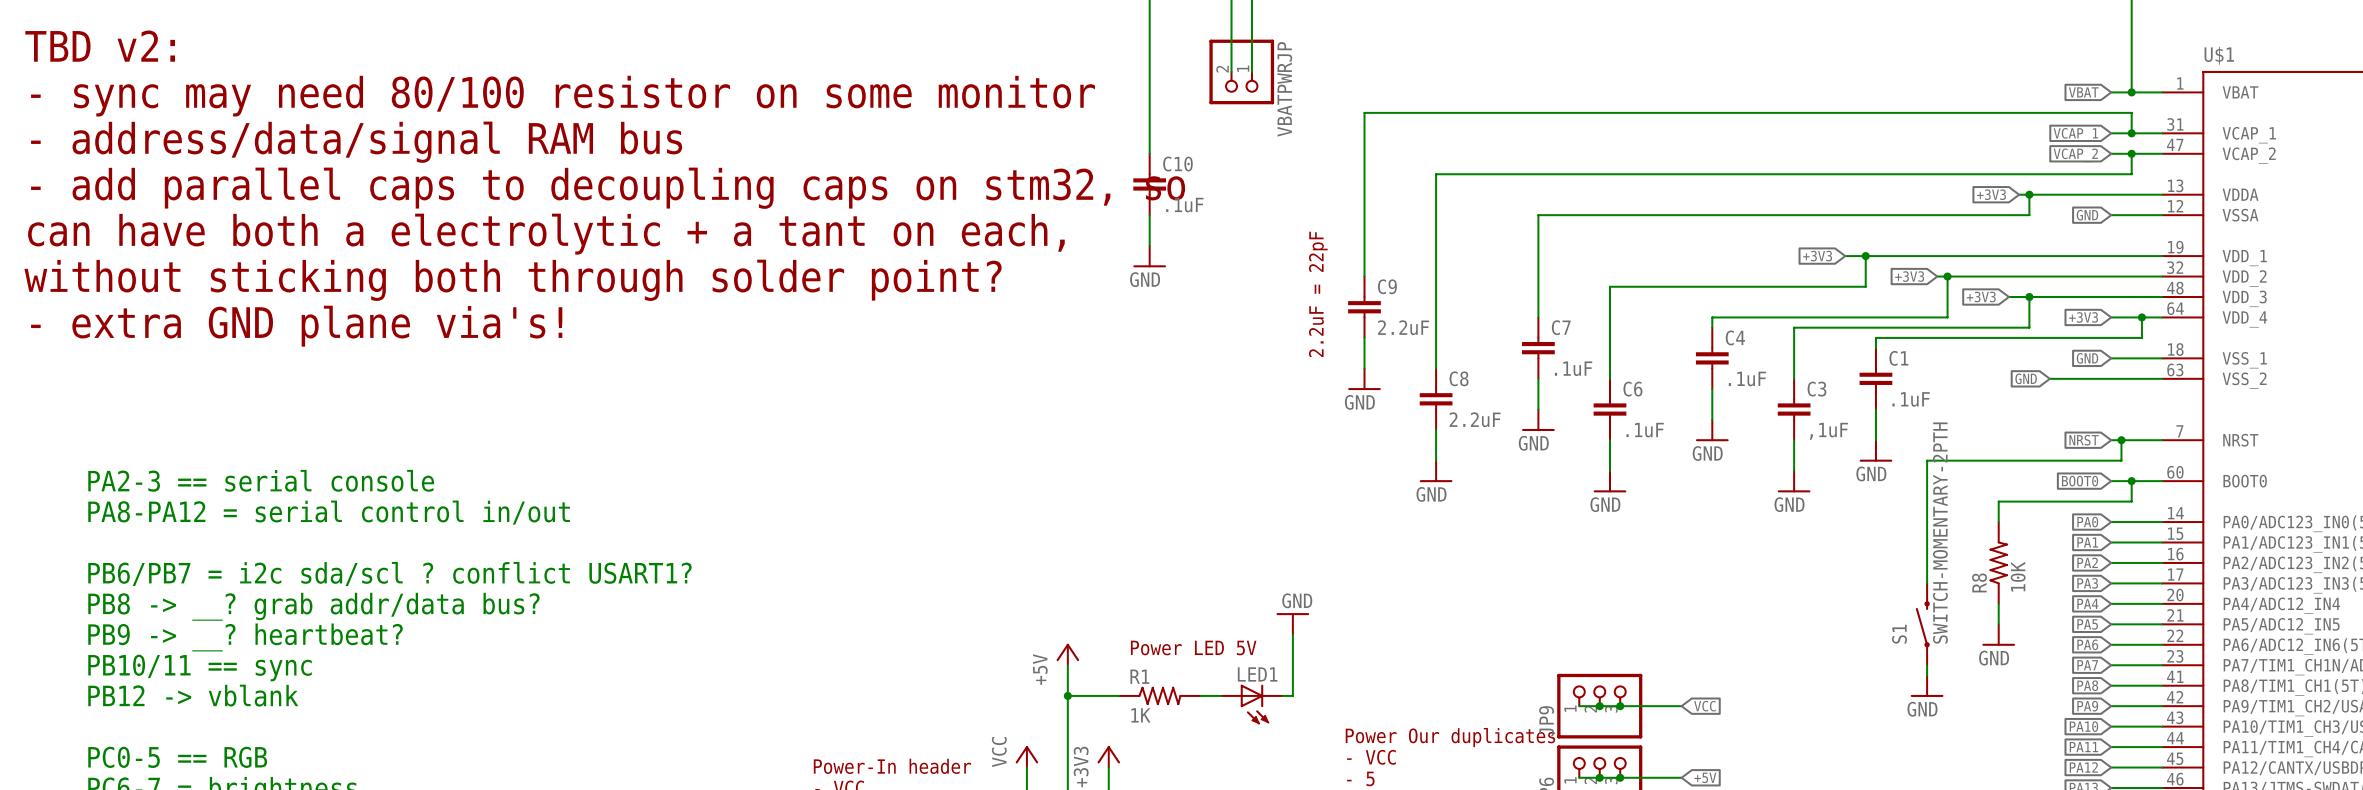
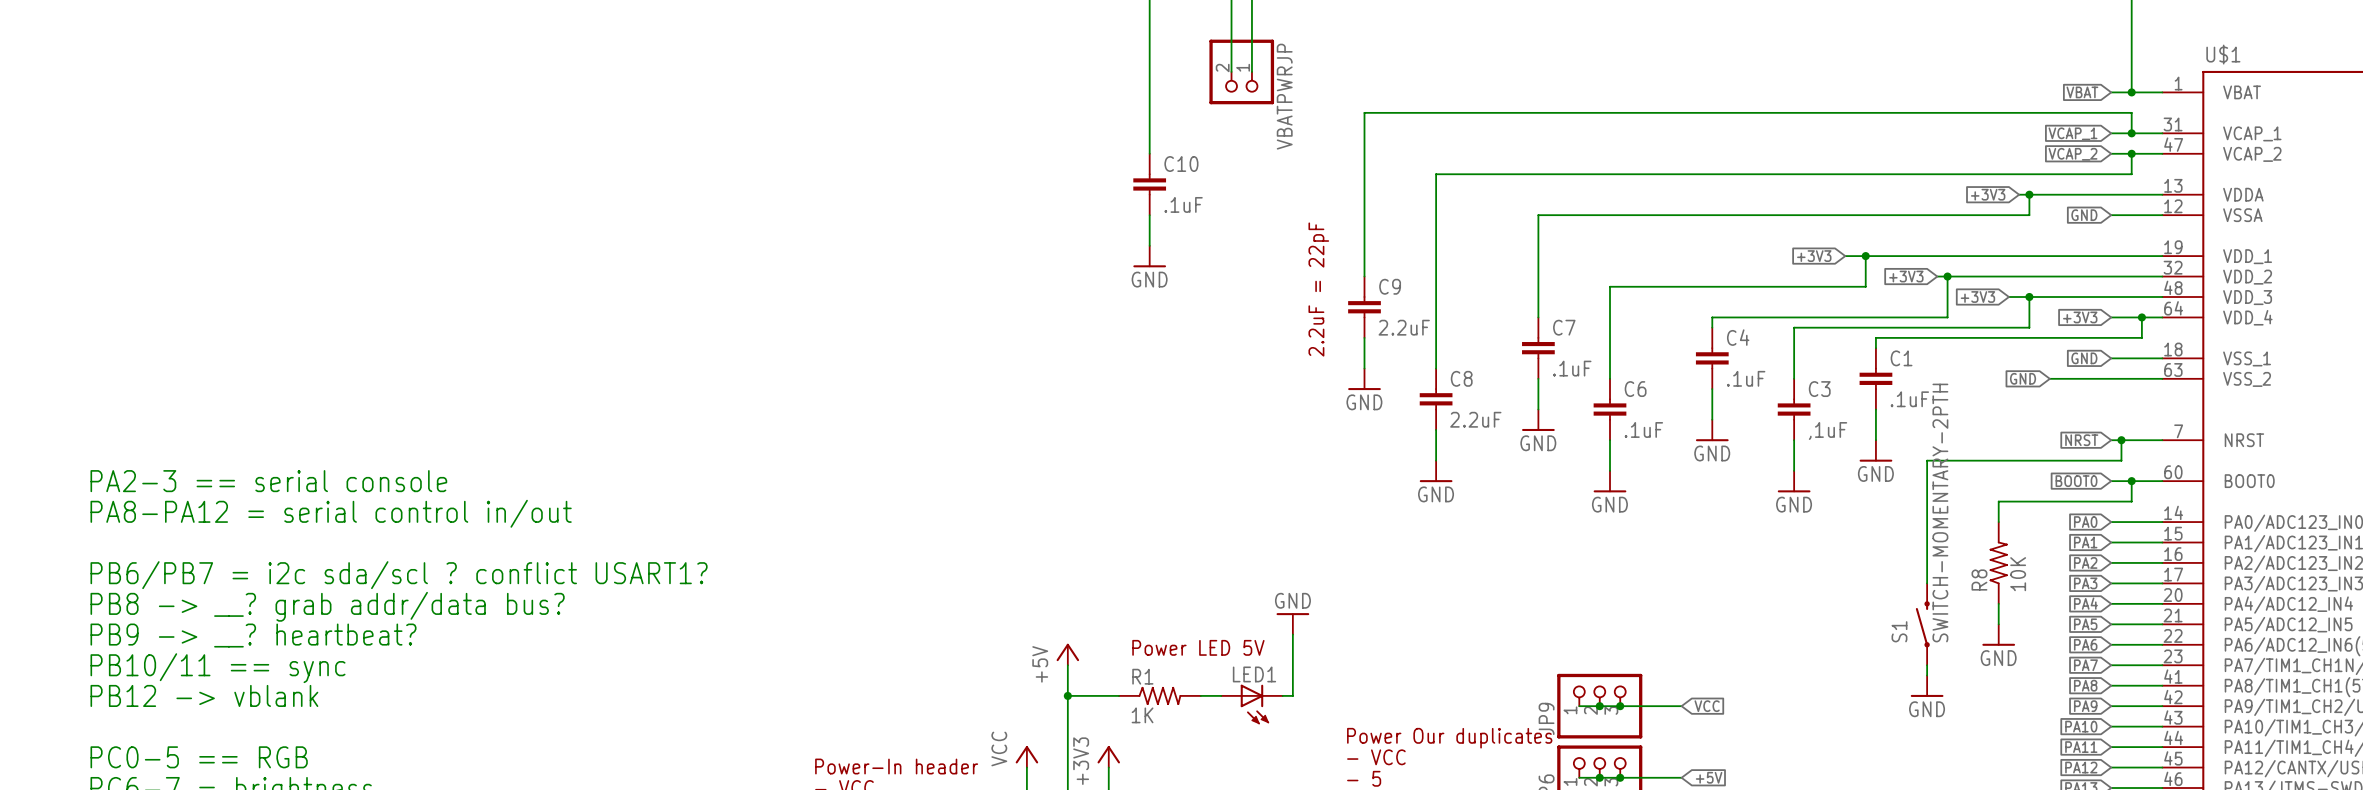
text: TBD v2: (100, 46) -> none
text: - sync may need 80/100 resistor on some monitor (563, 96) -> none
text: - address/data/signal RAM bus (356, 142) -> none
text: - add parallel caps to decoupling caps on stm32, so (608, 188) -> none
text: can have both a electrolytic + a tant on each, (546, 234) -> none
text: without sticking both through solder point? (513, 280) -> none
text: - extra GND plane via's! (296, 326) -> none

